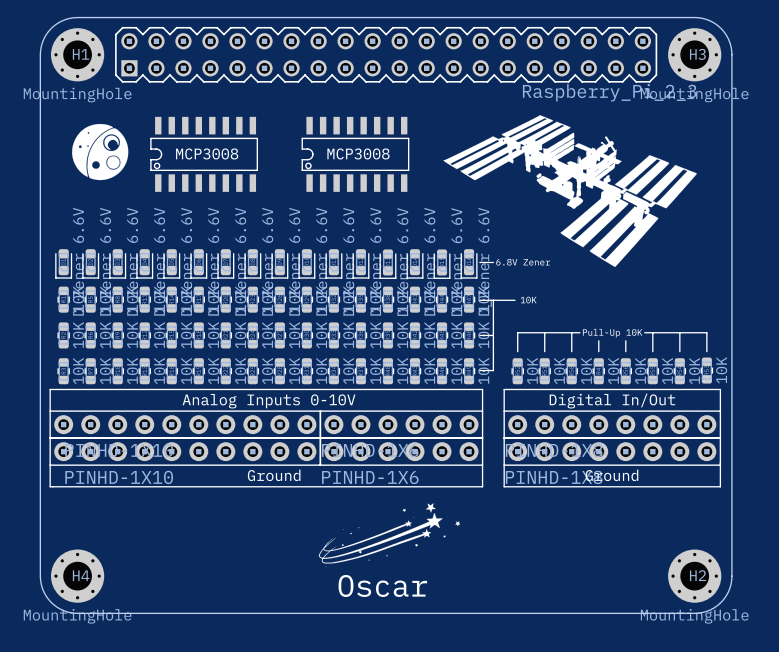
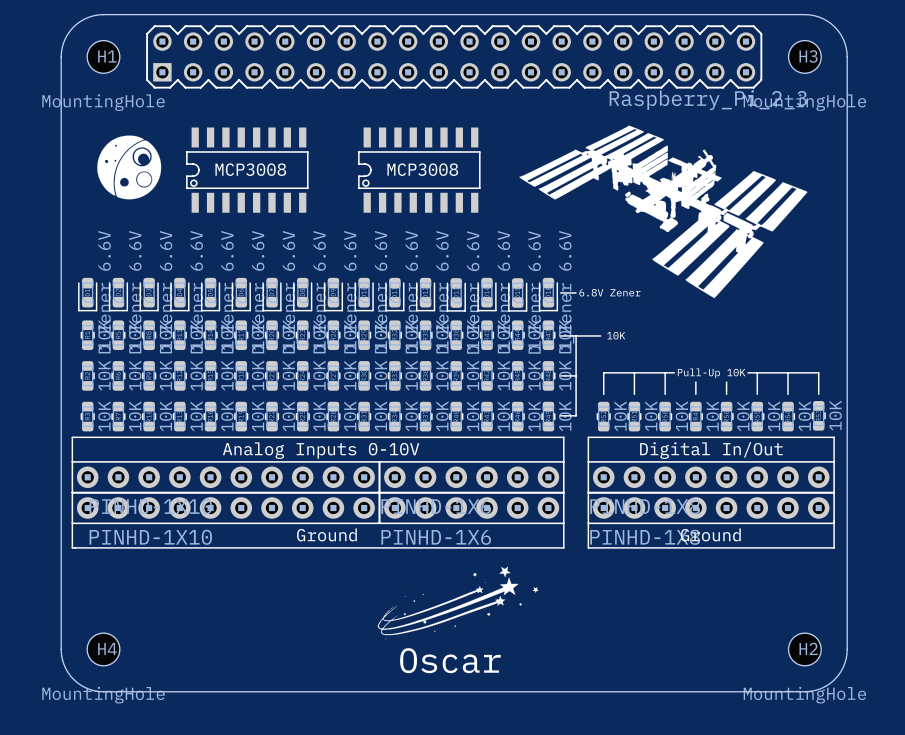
H1 footprint: [50, 28, 105, 82] -> [87, 40, 120, 74]
H3 footprint: [668, 28, 722, 82] -> [788, 40, 822, 74]
H4 footprint: [50, 549, 105, 603] -> [87, 633, 120, 666]
H2 footprint: [668, 549, 722, 603] -> [788, 633, 822, 666]

